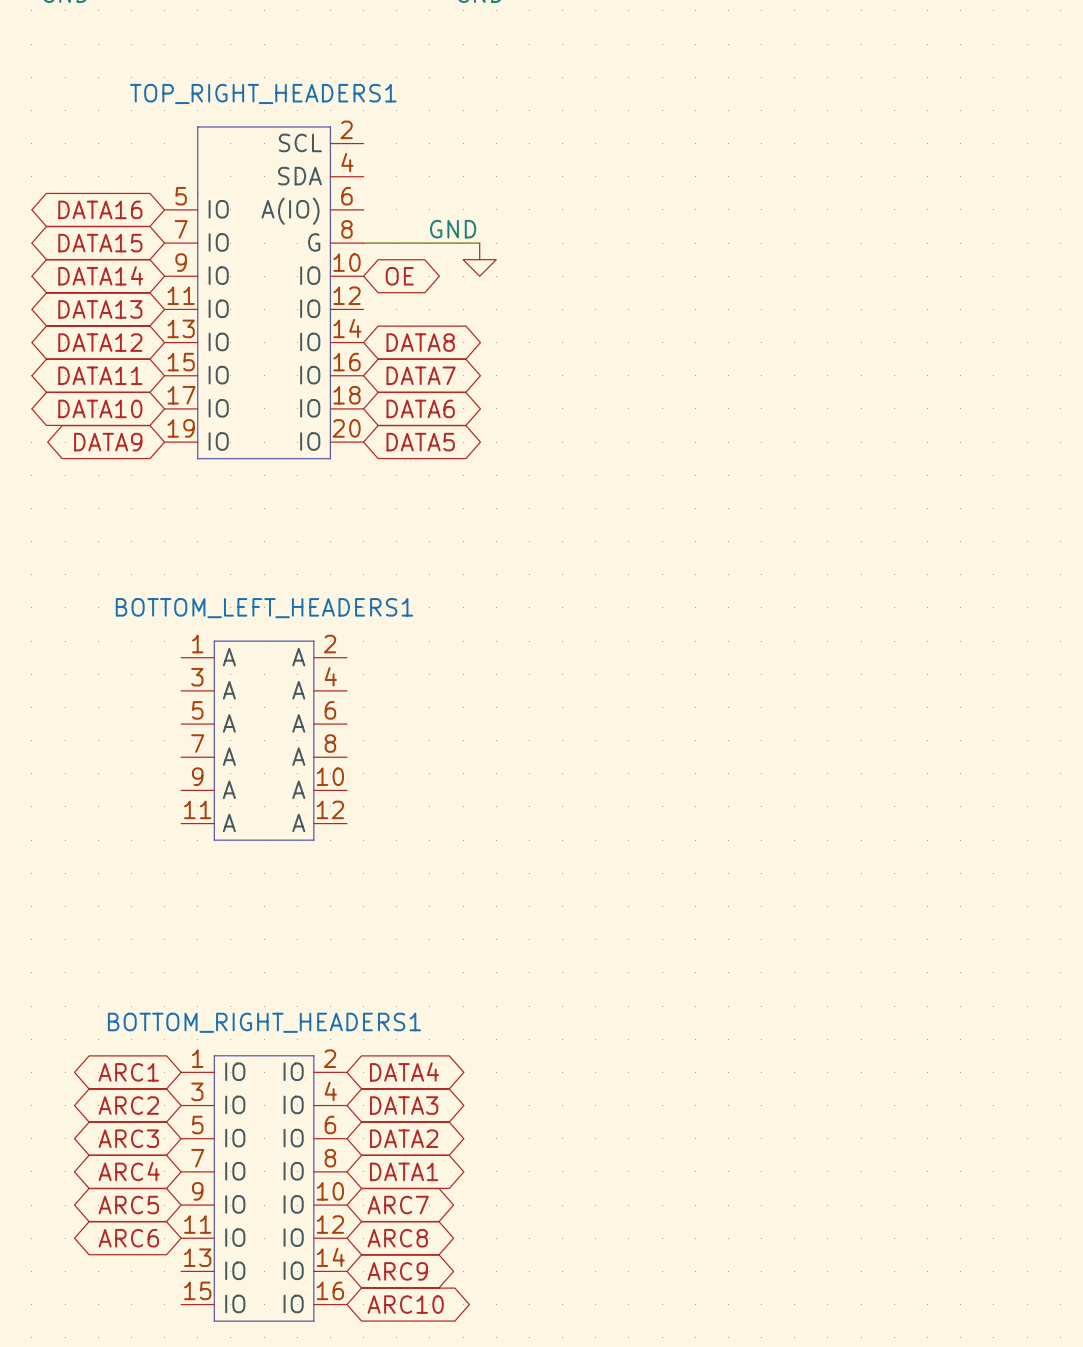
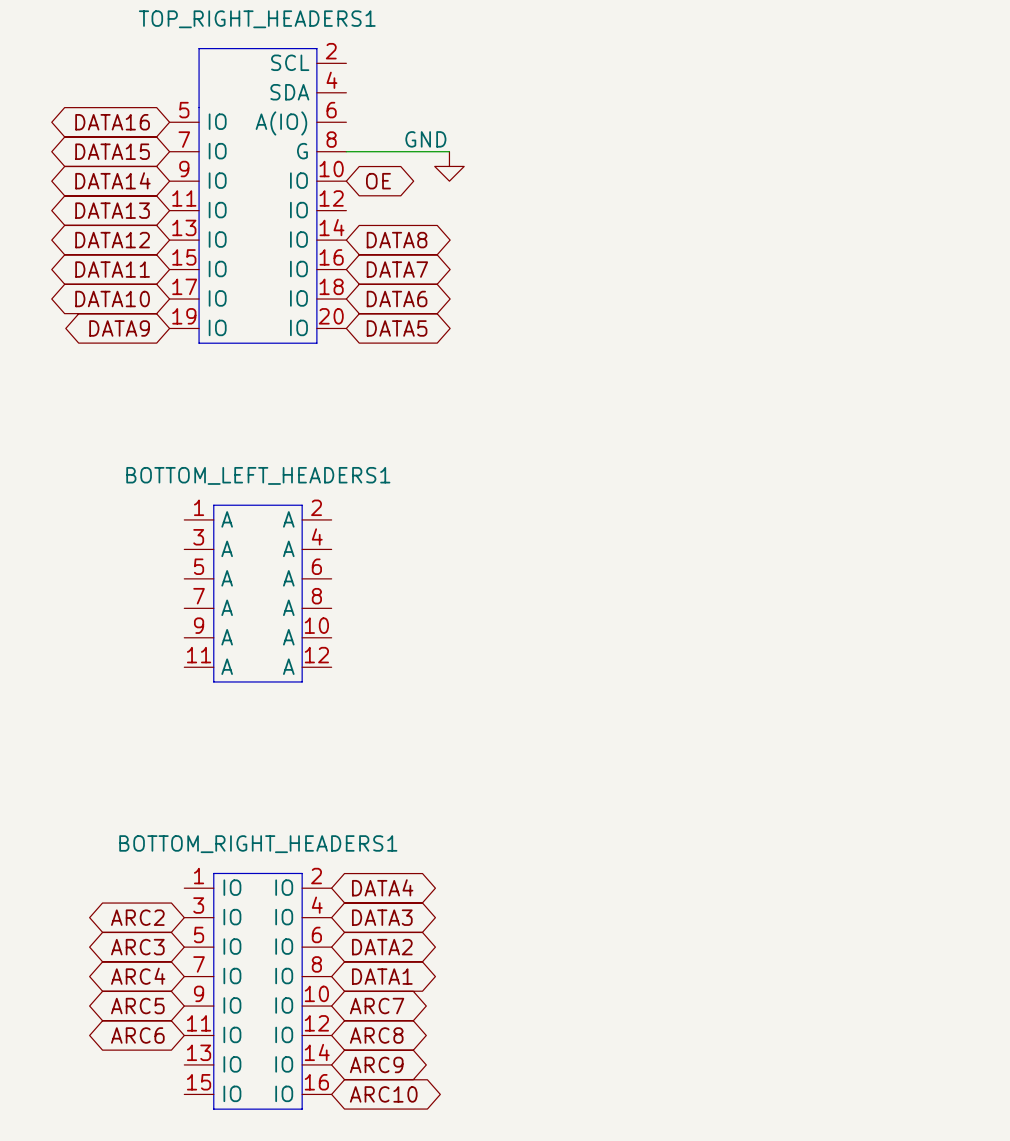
global label: ARC1 (128, 1072) -> none

